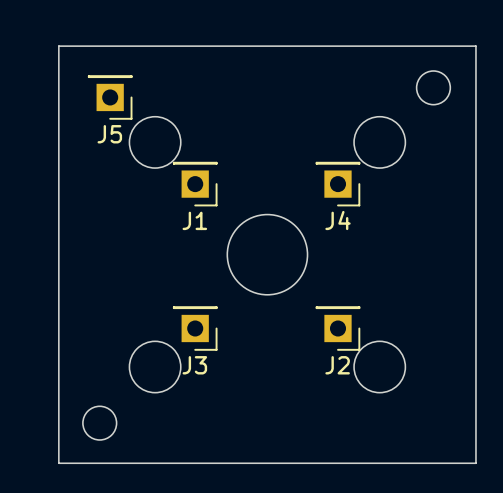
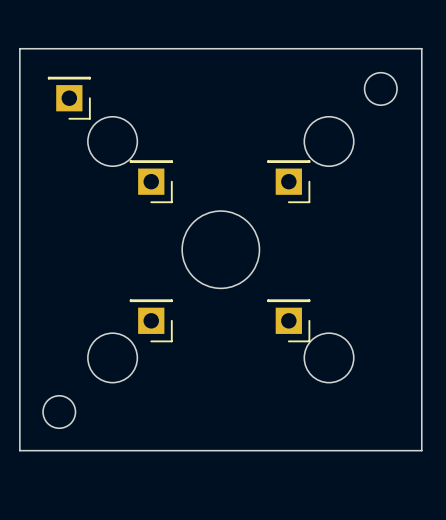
J5 name: J5 (109, 134) -> none
J1 name: J1 (194, 220) -> none
J4 name: J4 (338, 220) -> none
J3 name: J3 (194, 365) -> none
J2 name: J2 (337, 365) -> none

